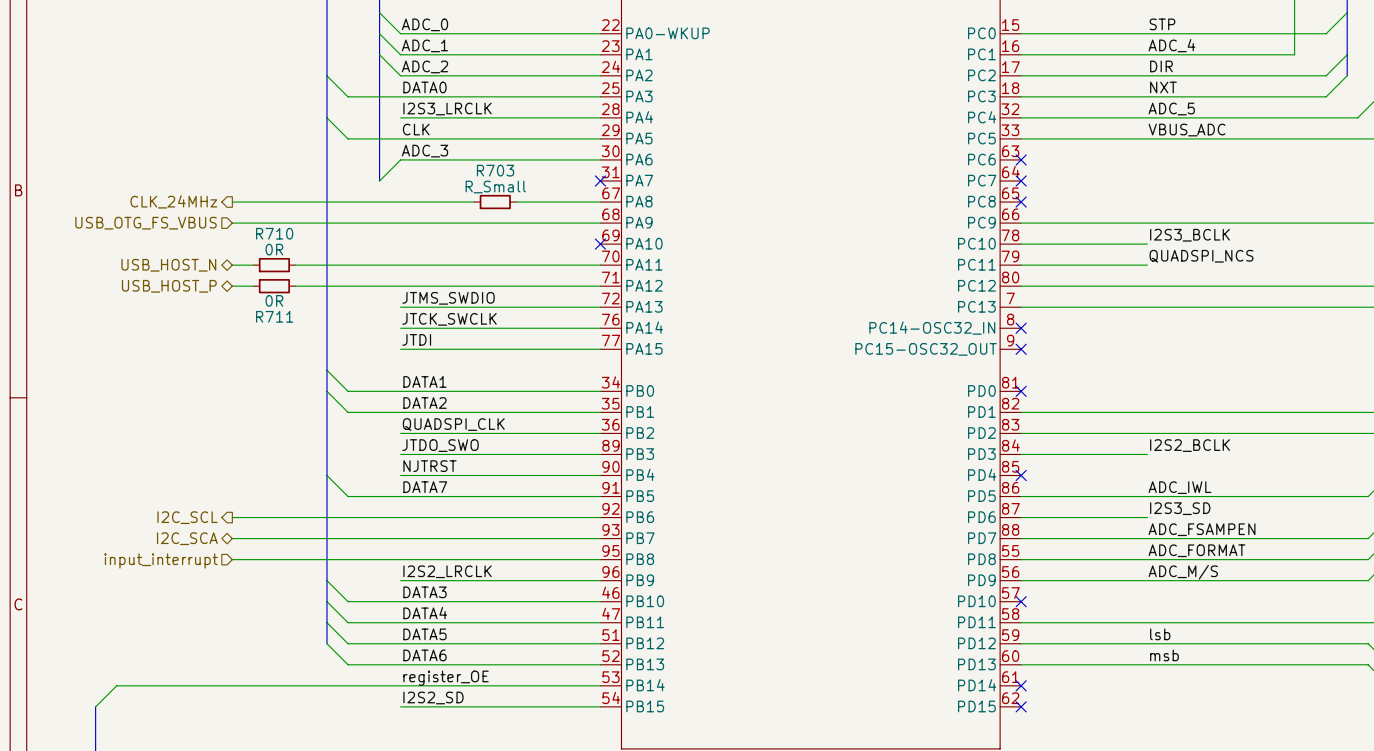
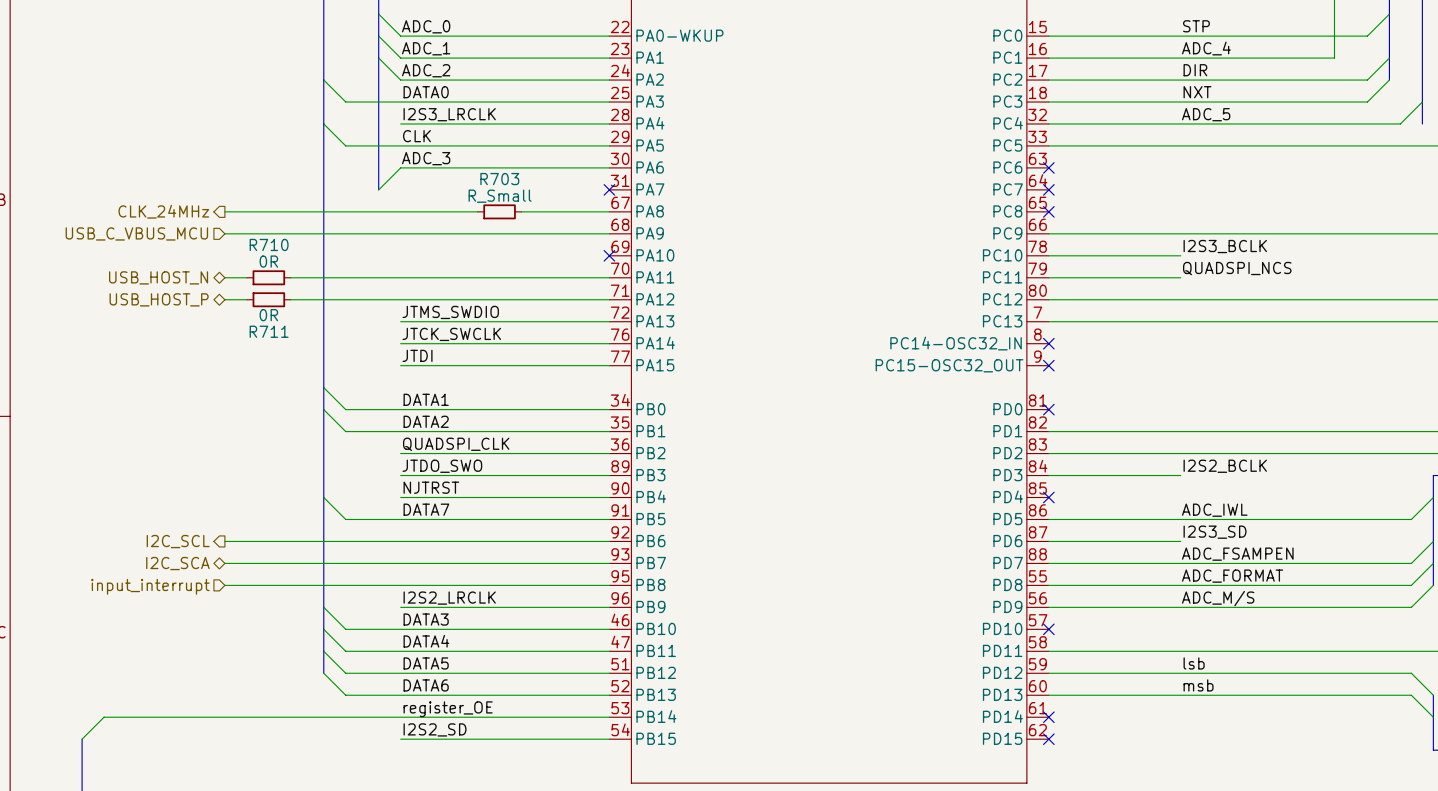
label: VBUS_ADC (1187, 130) -> none
hierarchical label: USB_OTG_FS_VBUS (146, 223) -> USB_C_VBUS_MCU (136, 233)

